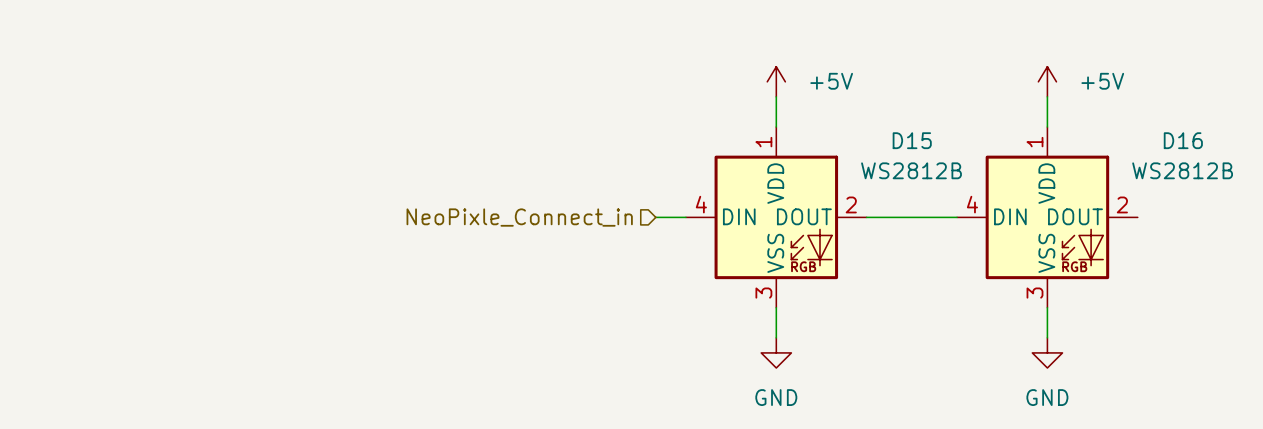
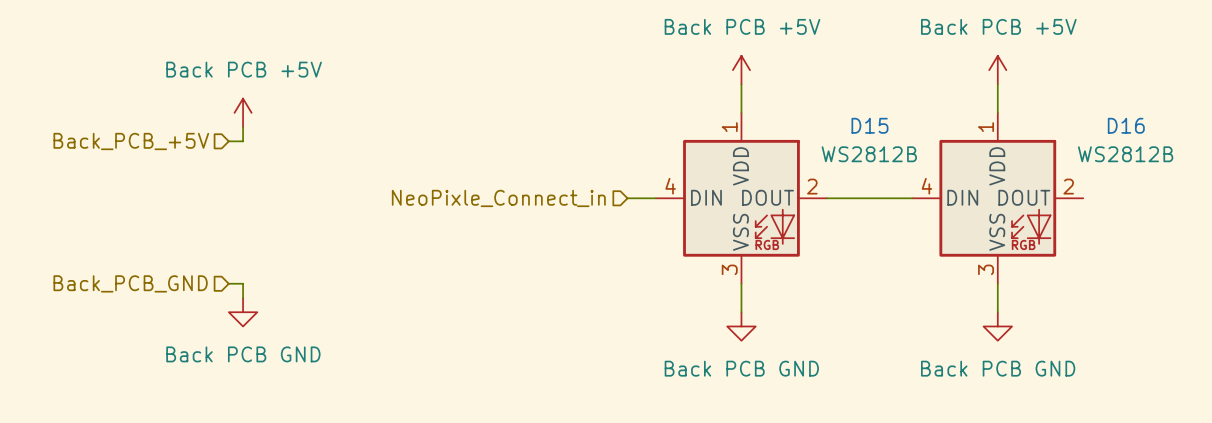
power symbol: +5V (776, 81) -> Back PCB +5V (741, 70)
power symbol: +5V (1047, 81) -> Back PCB +5V (997, 70)
power symbol: none -> Back PCB +5V (243, 112)
wire: none -> (243, 127) (243, 141) (228, 141)
hierarchical label: none -> Back_PCB_+5V (131, 141)
hierarchical label: none -> Back_PCB_GND (130, 283)
wire: none -> (228, 283) (243, 283) (243, 297)
power symbol: none -> Back PCB GND (243, 312)
power symbol: GND (776, 352) -> Back PCB GND (741, 326)
power symbol: GND (1047, 352) -> Back PCB GND (997, 326)

